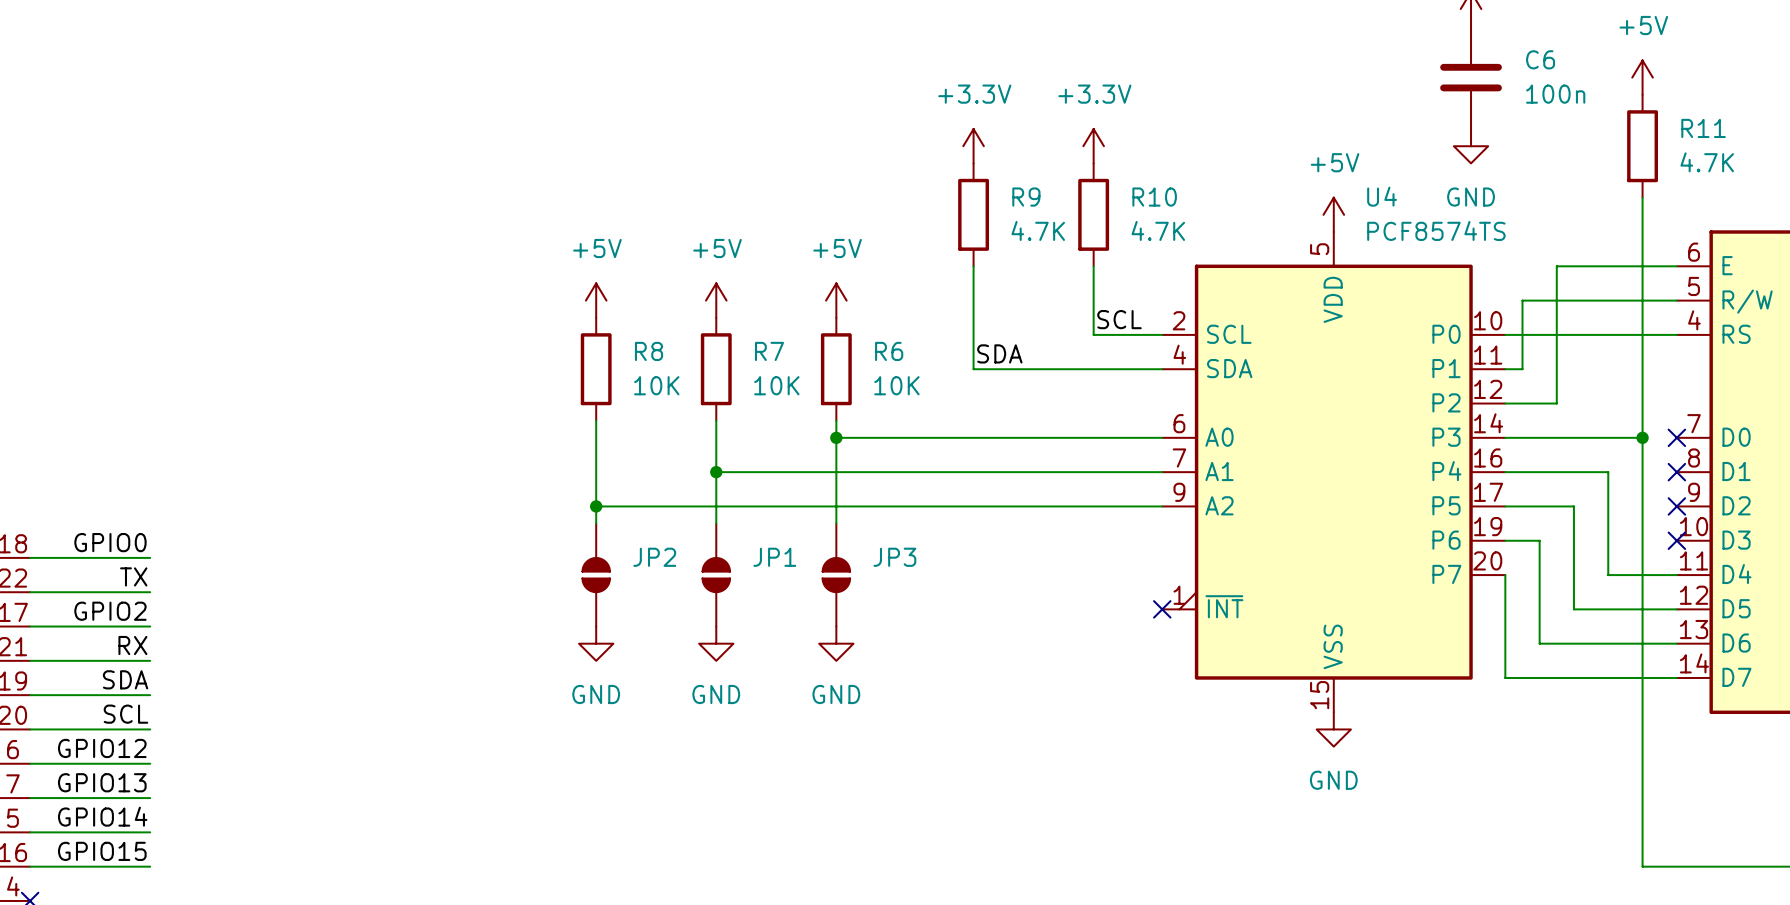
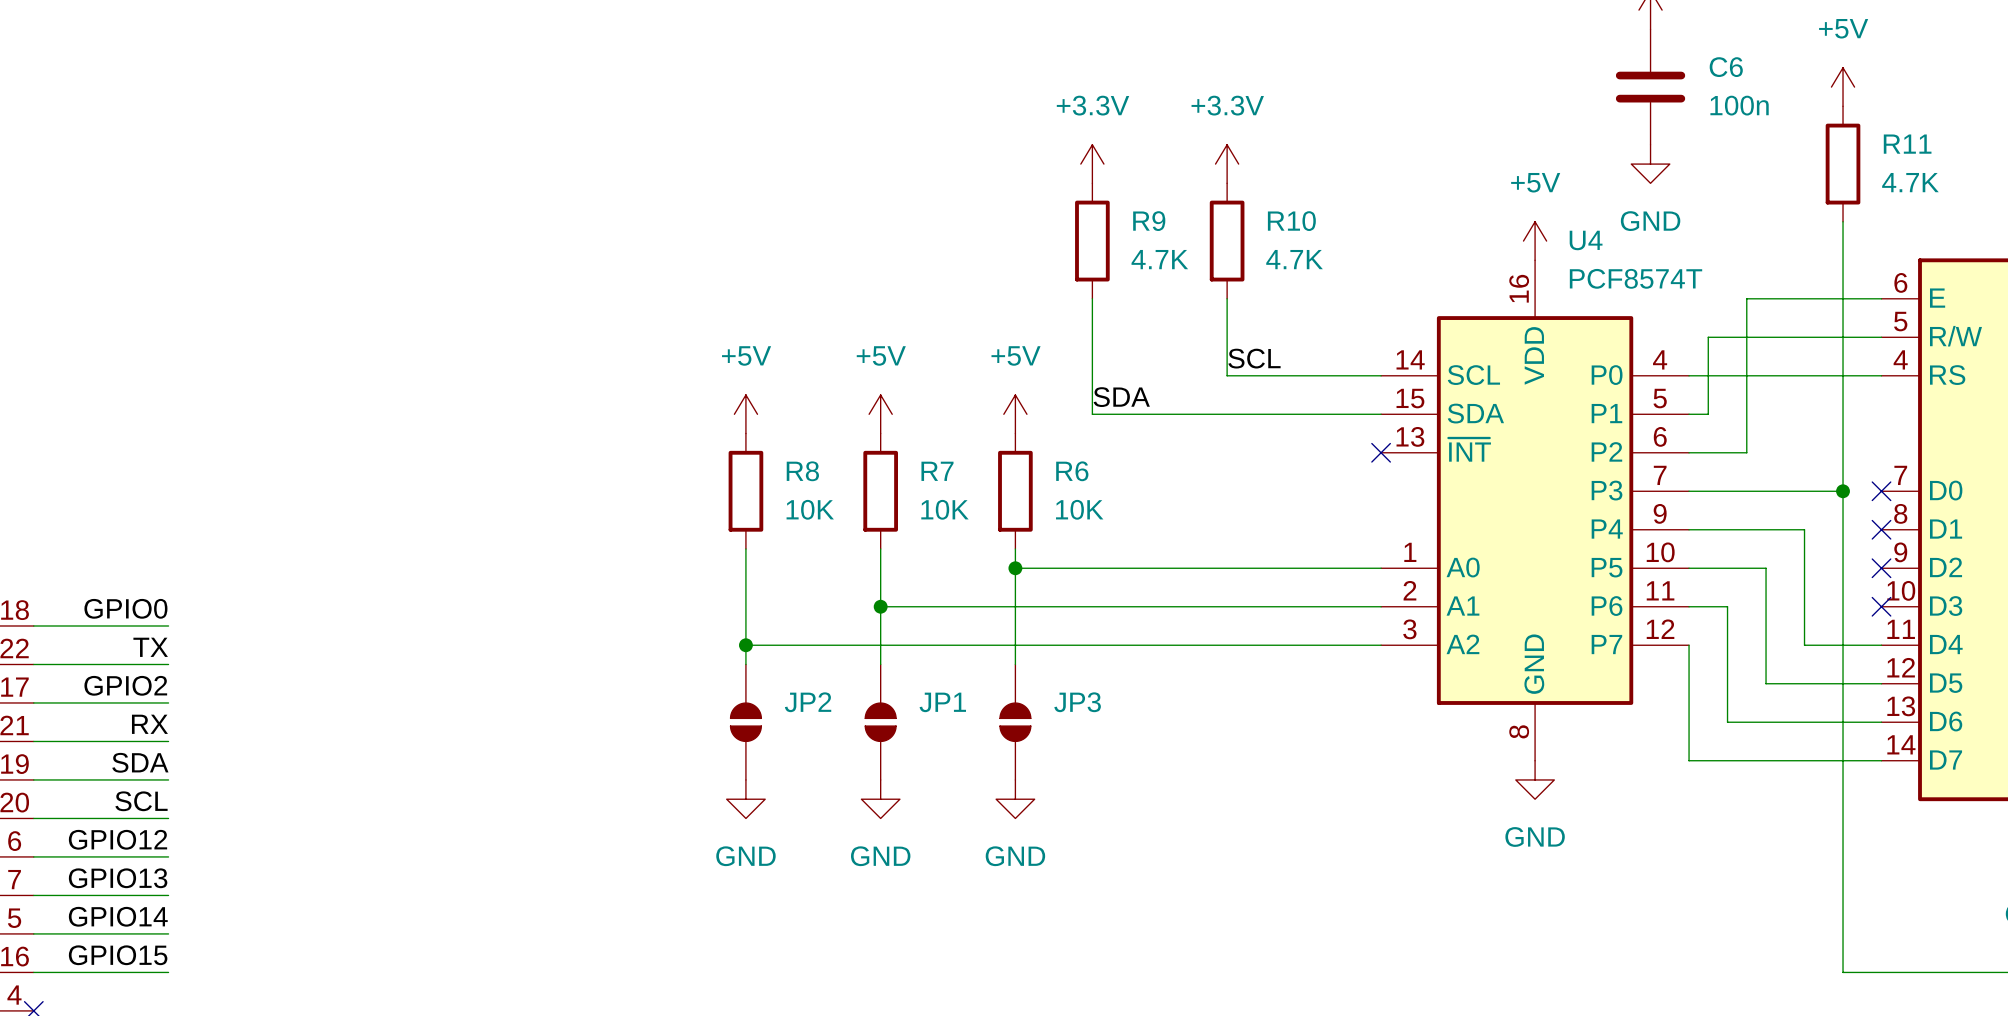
U4 name position: U4 (1382, 196) -> U4 (1586, 240)
power symbol position: +5V (1333, 214) -> +5V (1535, 241)
U4 value: PCF8574TS (1436, 230) -> PCF8574T (1636, 278)
U4 symbol: [1162, 231, 1506, 713] -> [1381, 260, 1690, 761]
power symbol: +5V (596, 300) -> none
power symbol: +5V (716, 300) -> none
power symbol: +5V (836, 300) -> none
R8 position: (596, 369) -> (745, 491)
power symbol: none -> +5V (745, 414)
R7 position: (716, 369) -> (880, 491)
power symbol: none -> +5V (880, 414)
R6 position: (836, 369) -> (1015, 491)
power symbol: none -> +5V (1015, 414)
no-connect mark: none -> (1381, 452)
wire: (596, 420) (596, 523) -> (745, 549) (745, 664)
wire: (716, 420) (716, 523) -> (880, 549) (880, 664)
wire: (836, 420) (836, 523) -> (1015, 549) (1015, 664)
wire: (836, 437) (1162, 437) -> none
junction: (836, 437) -> none
wire: (716, 472) (1162, 472) -> (880, 606) (1381, 606)
junction: (716, 472) -> none
wire: (596, 506) (904, 506) -> none
junction: (596, 506) -> none
junction: none -> (1015, 568)
junction: none -> (880, 606)
JP2 position: (596, 575) -> (745, 722)
wire: none -> (745, 645) (1381, 645)
junction: none -> (745, 645)
JP1 position: (716, 575) -> (880, 722)
JP3 position: (836, 575) -> (1015, 722)
no-connect mark: (1162, 609) -> none
power symbol: GND (596, 643) -> none
power symbol: GND (716, 643) -> none
power symbol: GND (836, 643) -> none
power symbol: none -> GND (745, 799)
power symbol: none -> GND (880, 799)
power symbol: none -> GND (1015, 799)
power symbol position: GND (1333, 729) -> GND (1535, 779)

